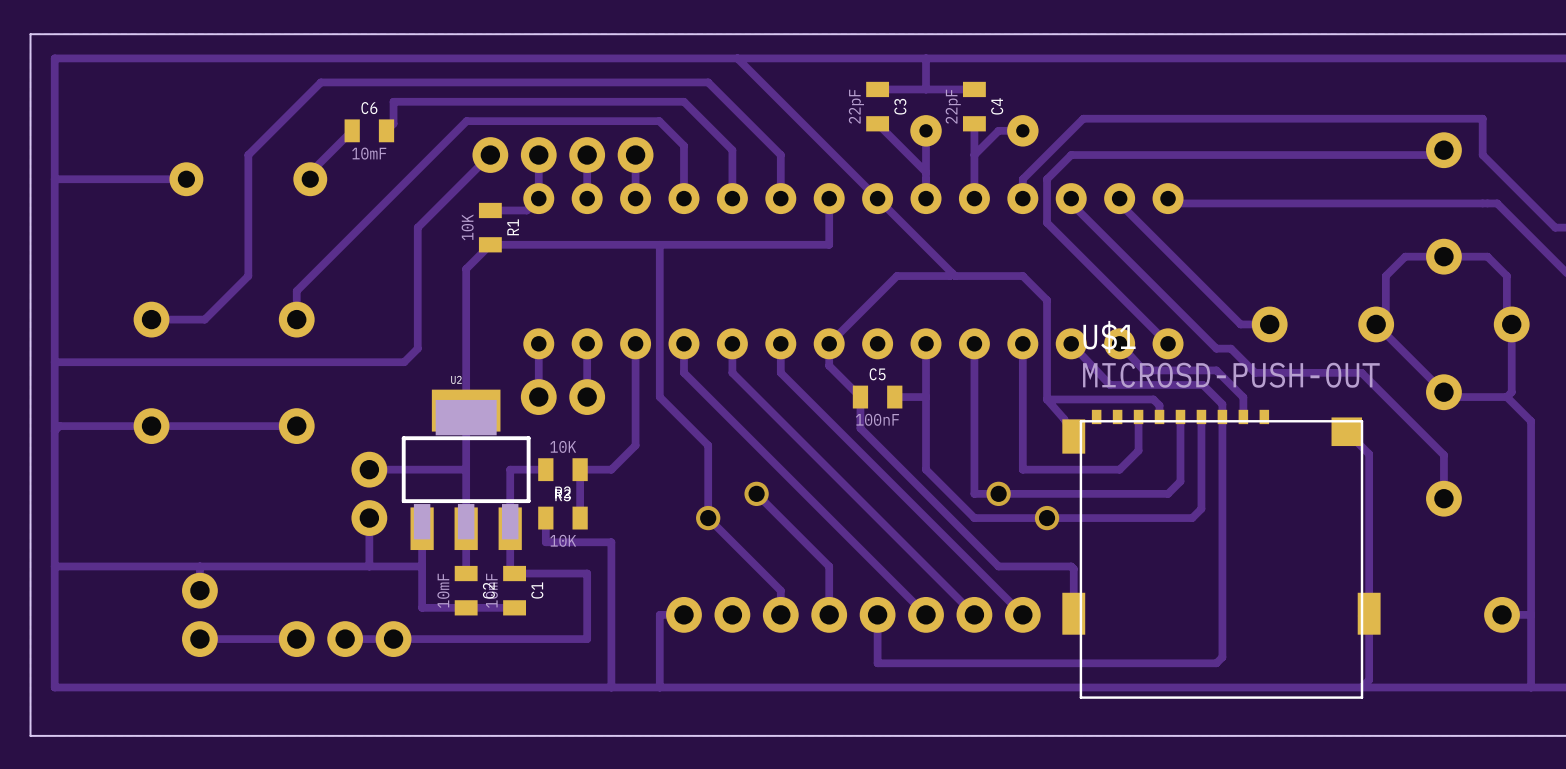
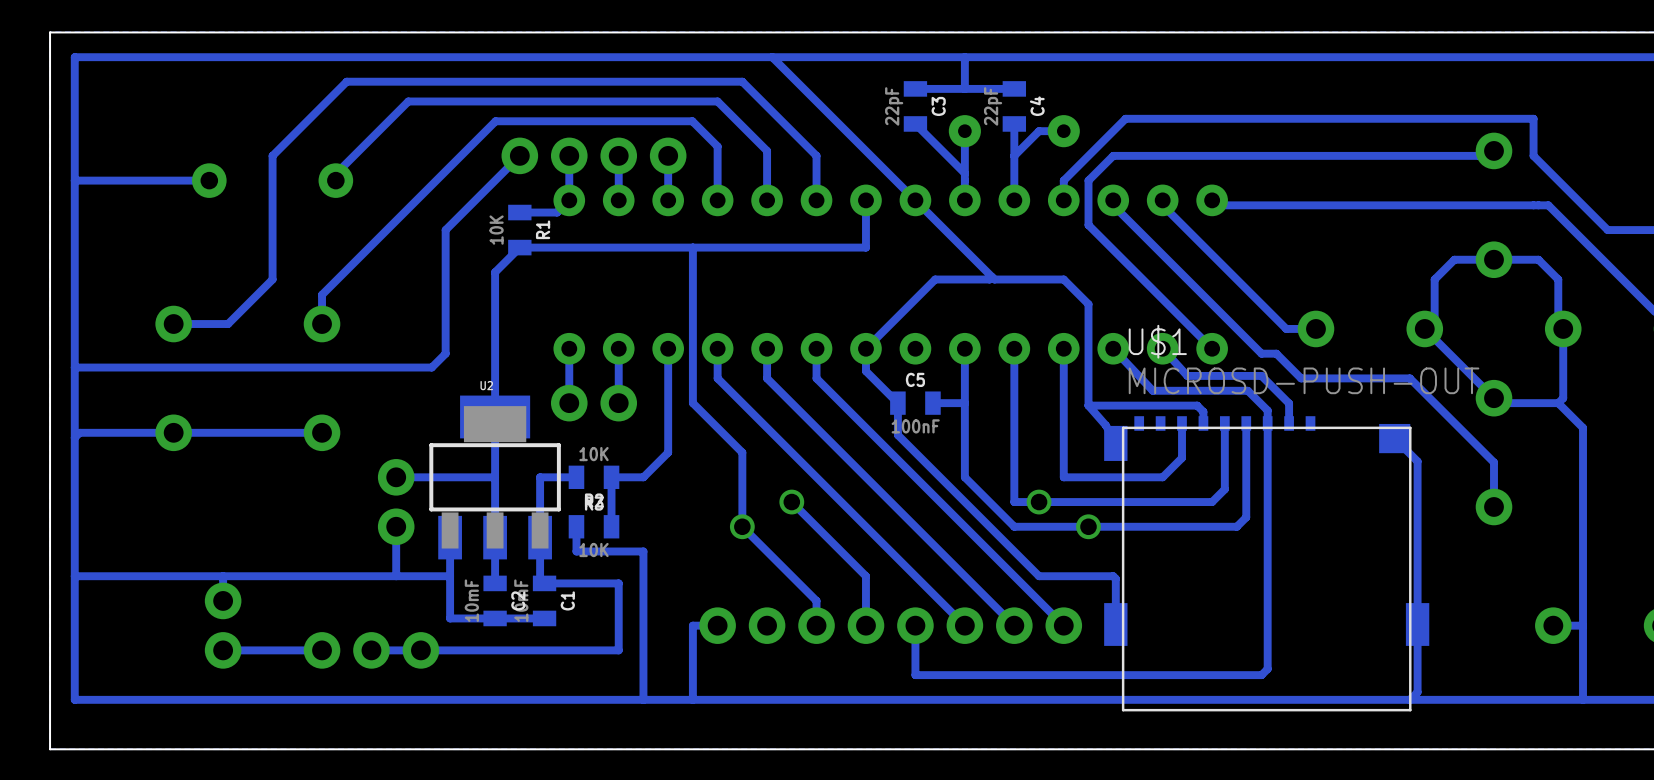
track: (393, 101) (393, 123) (386, 130) -> (420, 101) (408, 101) (378, 131)
C6: 10mF (369, 130) -> none

